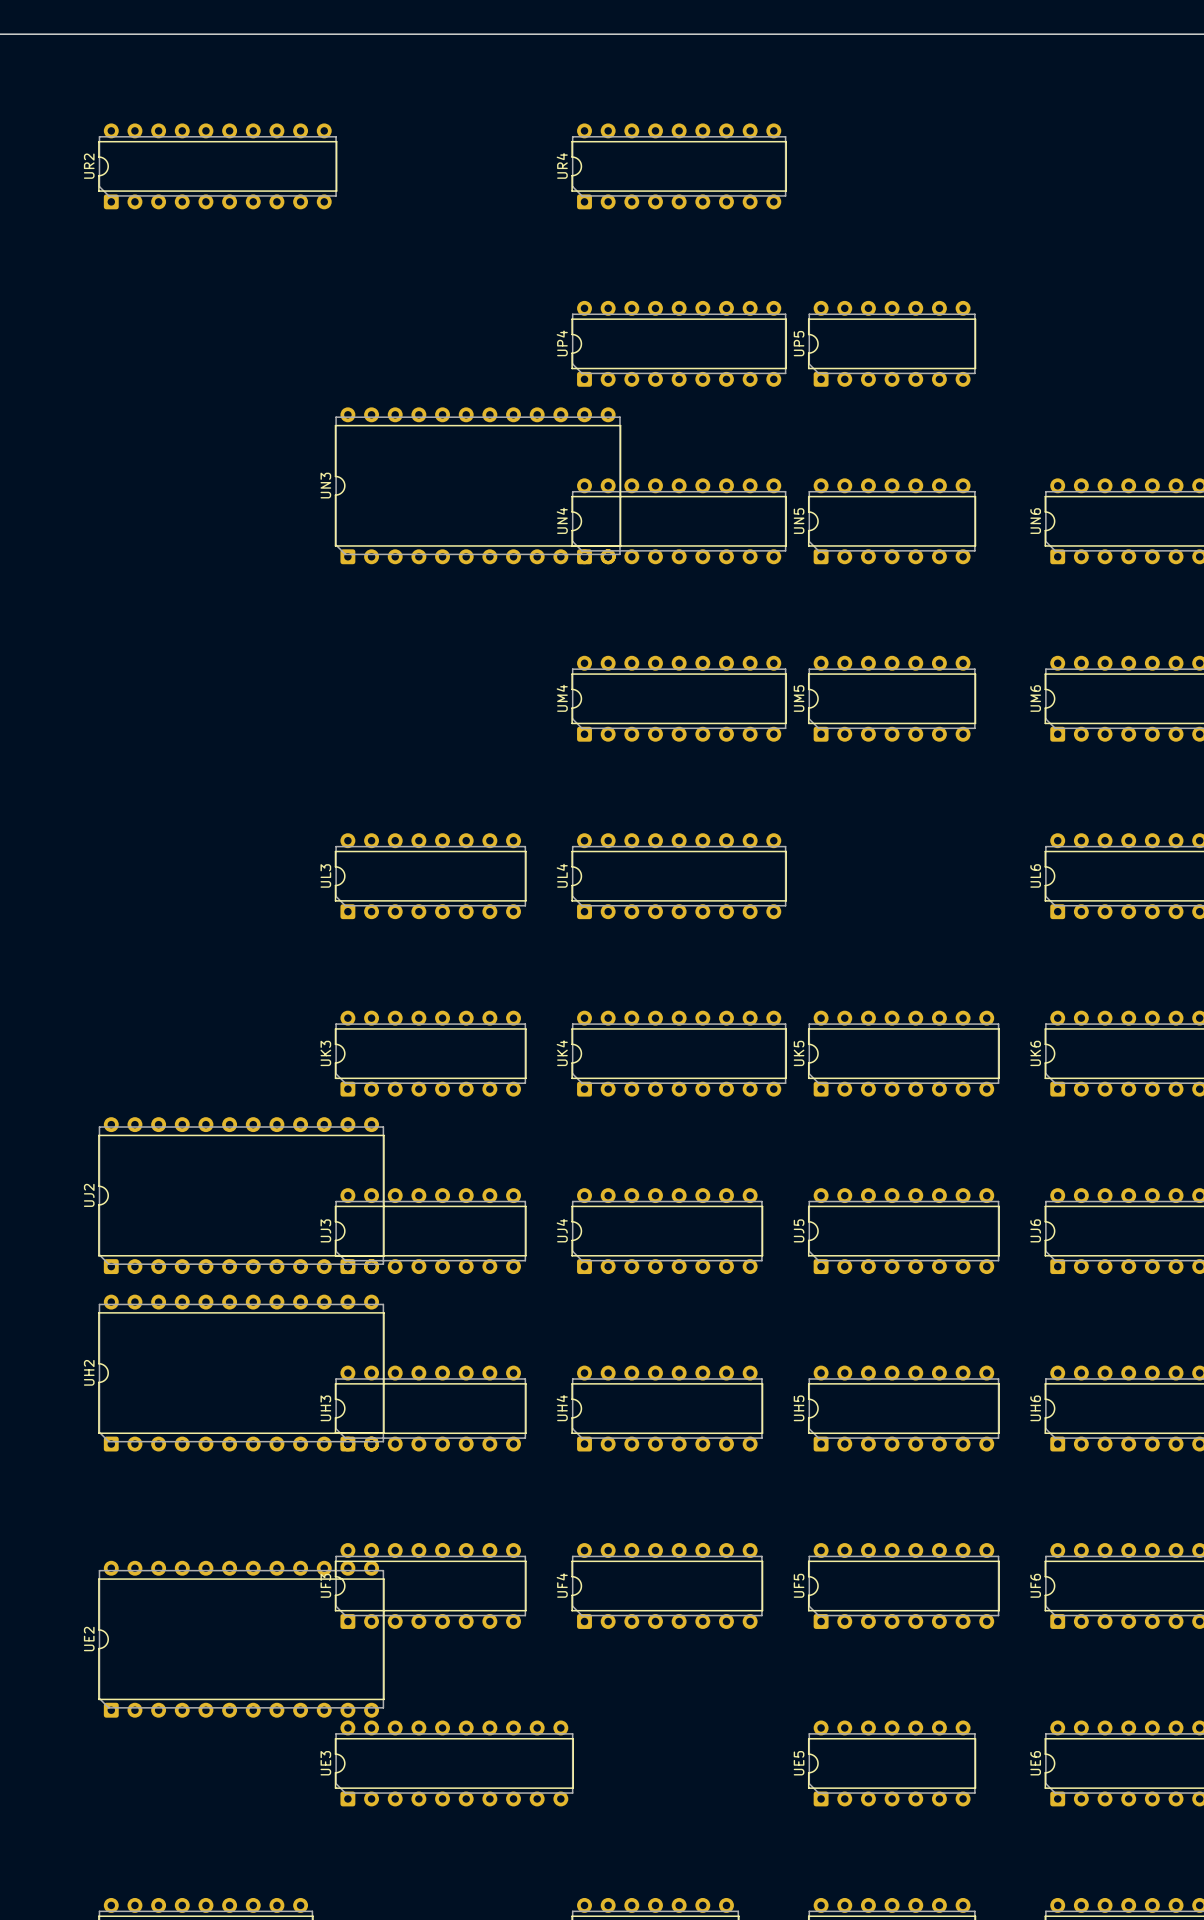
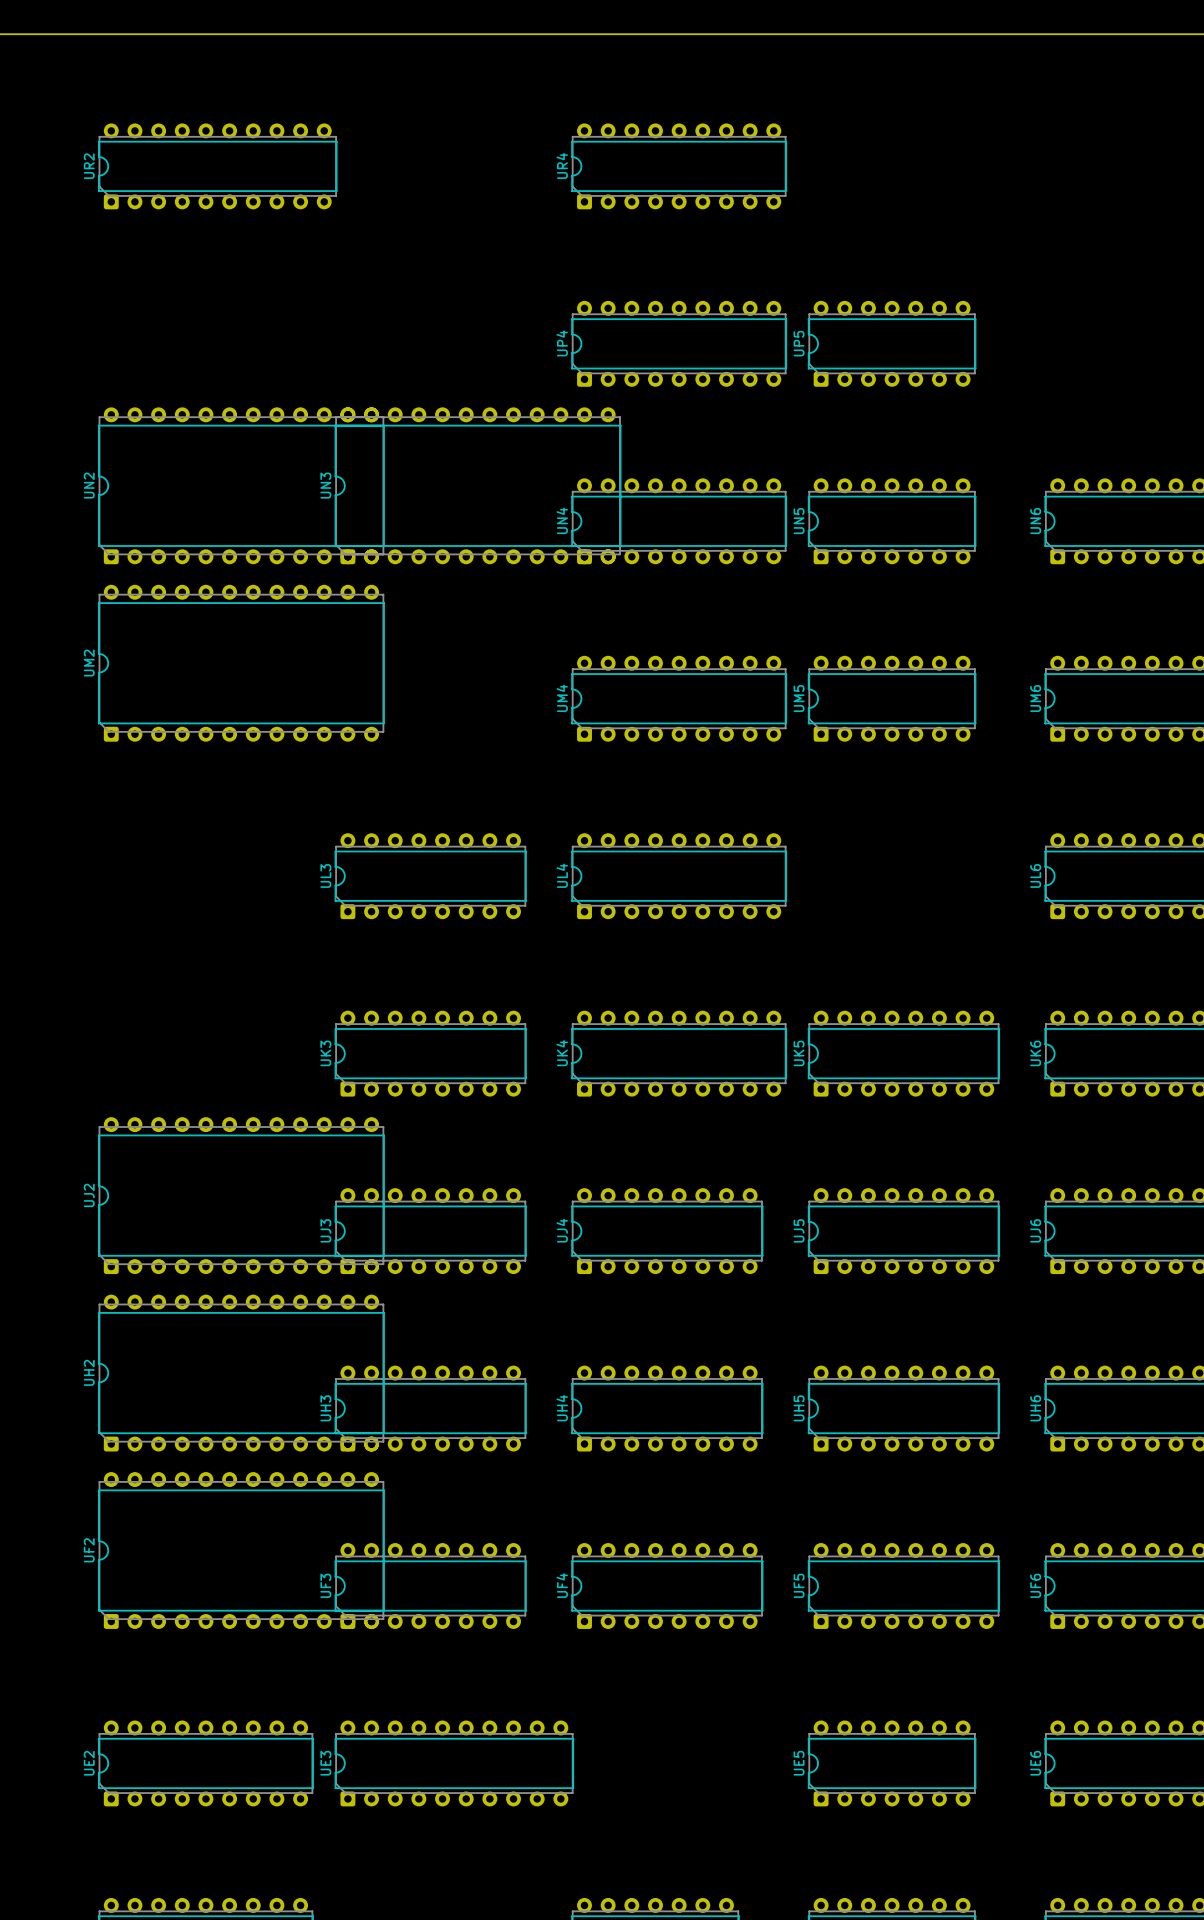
UN2: none -> (241, 485)
UM2: none -> (241, 663)
UF2: none -> (241, 1550)
UE2 footprint: [98, 1560, 385, 1718] -> [98, 1720, 314, 1807]
UE2 name position: UE2 (89, 1639) -> UE2 (89, 1763)

